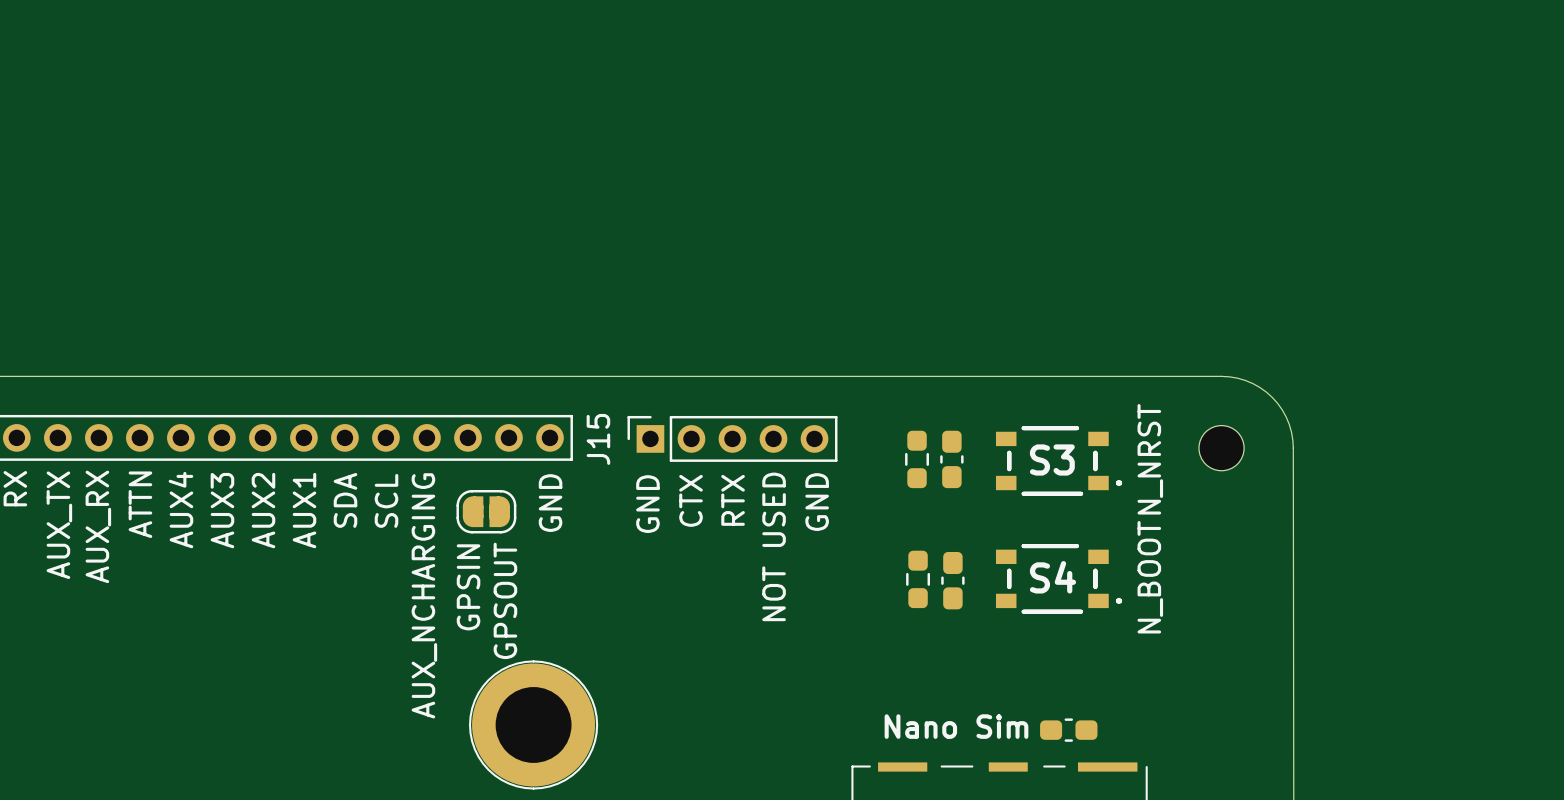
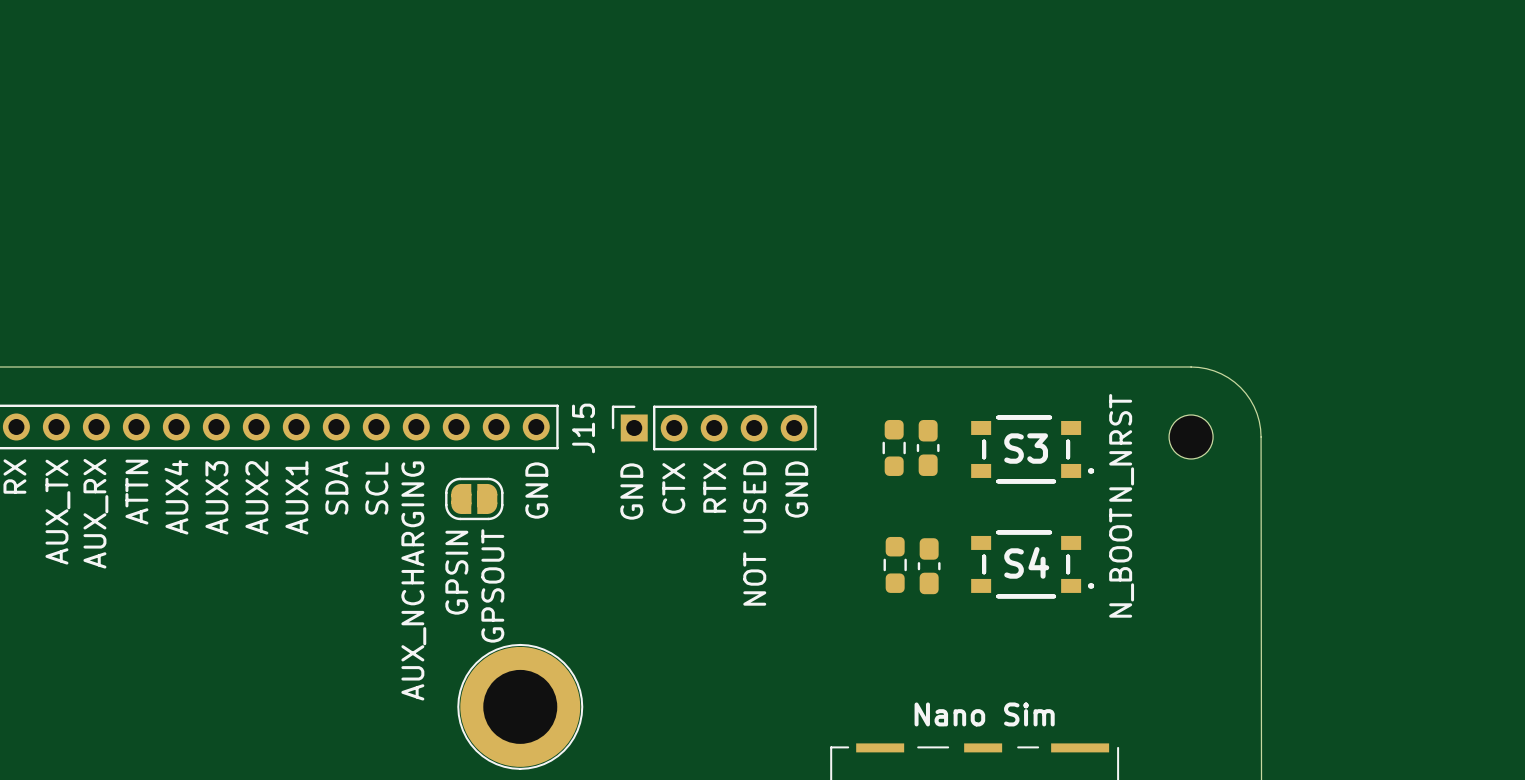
text position: Nano Sim (956, 726) -> Nano Sim (984, 714)
part: (1068, 730) -> none

